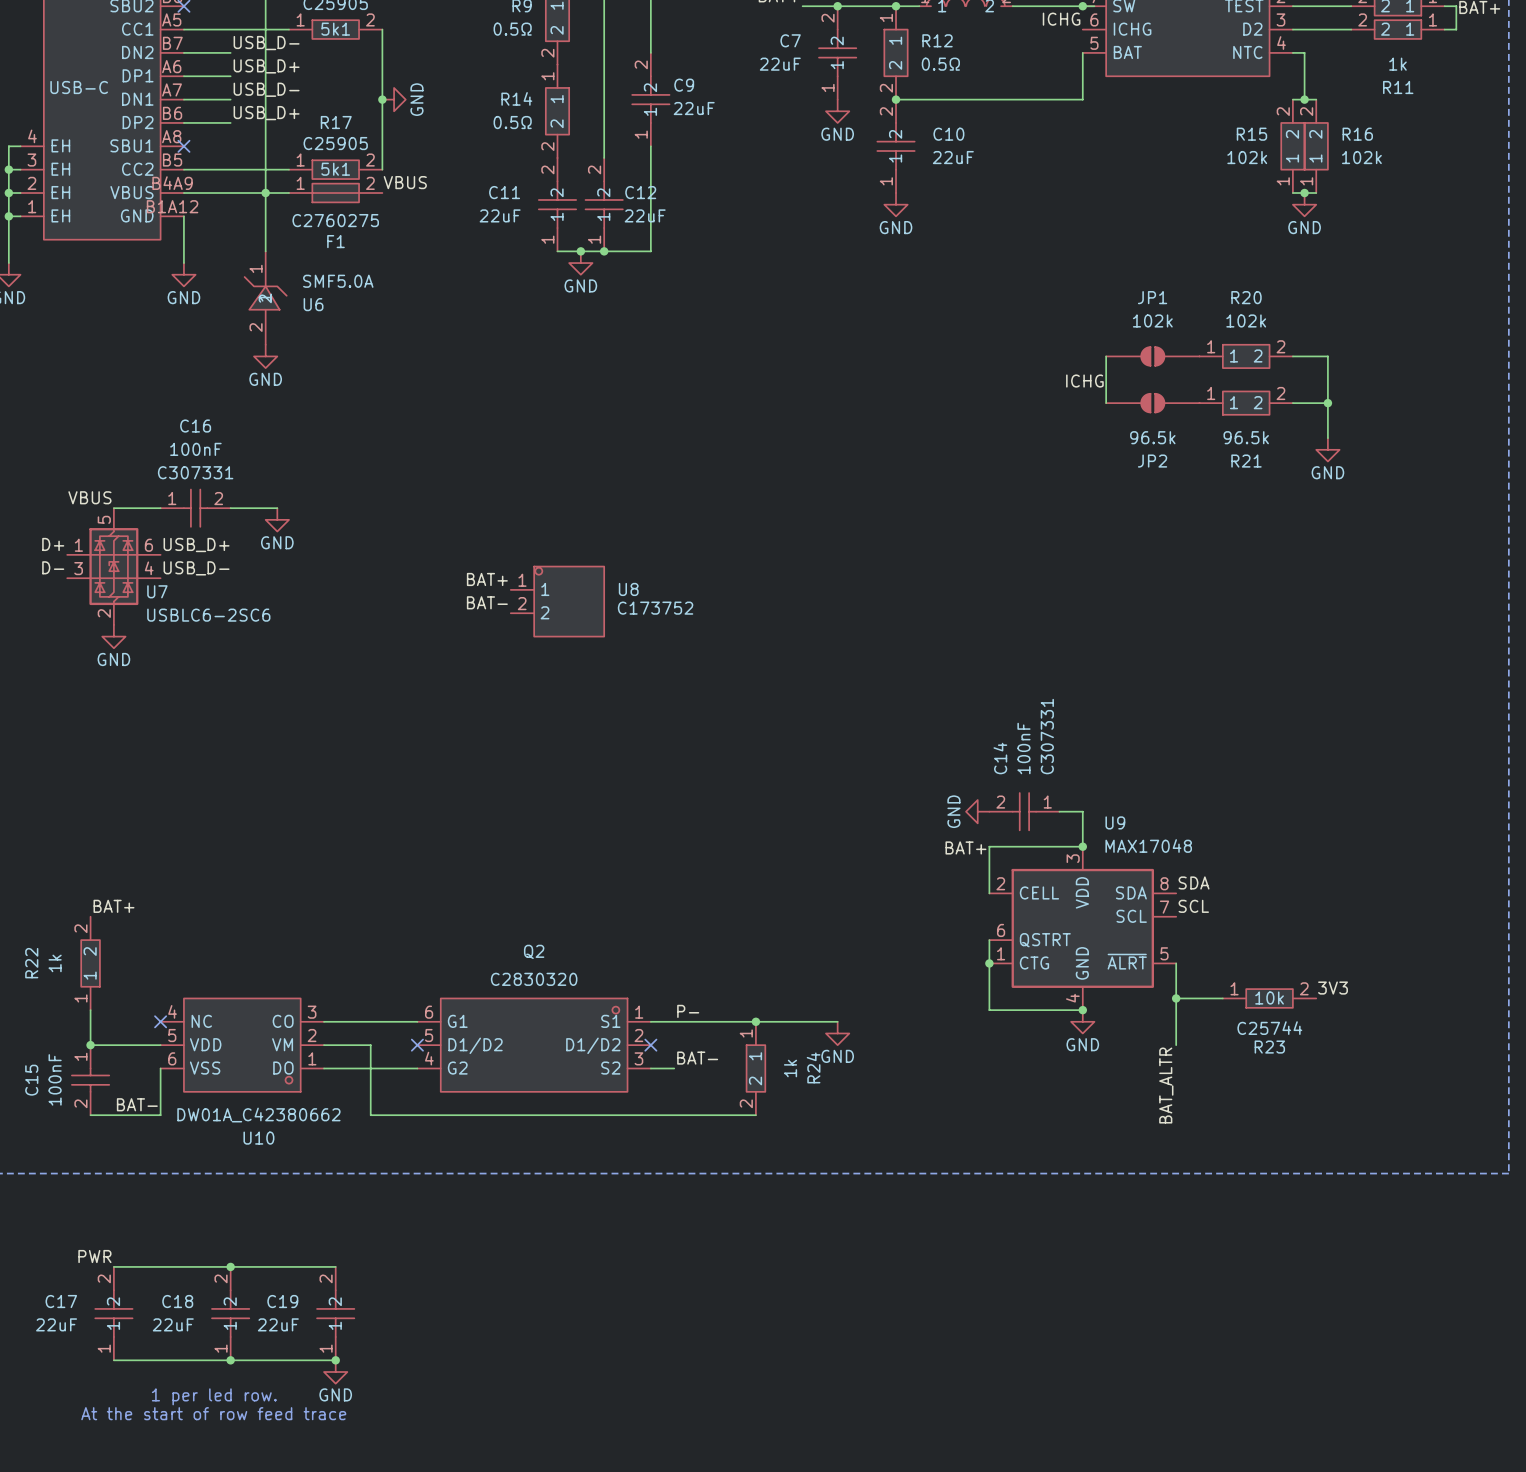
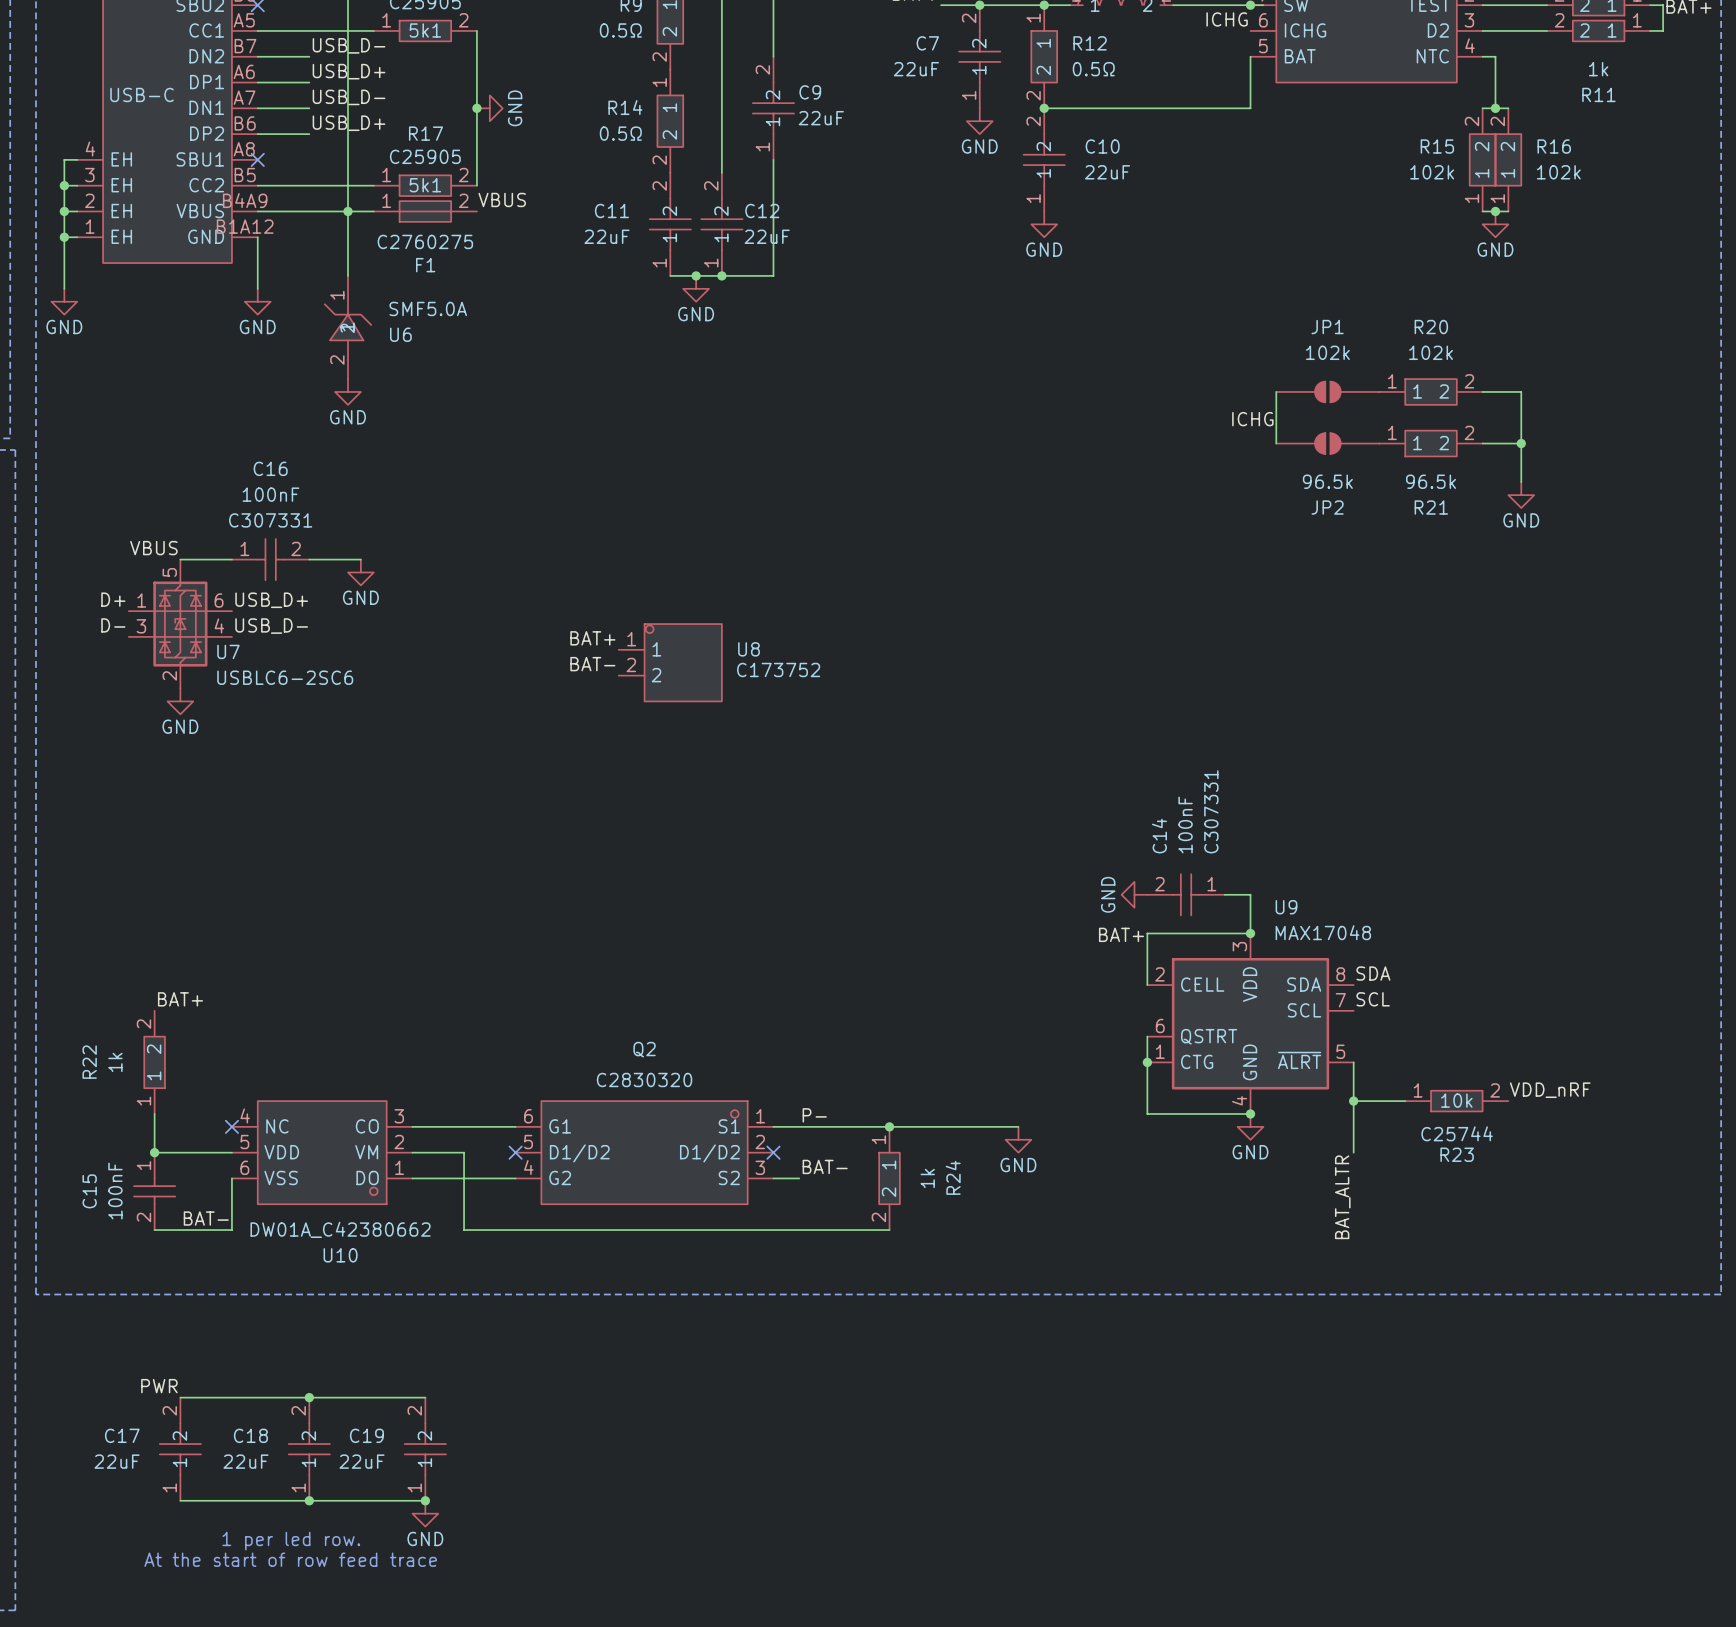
label: 3V3 (1333, 988) -> VDD_nRF (1550, 1090)
wire: none -> (979, 1126) (1018, 1126)
power symbol position: GND (837, 1033) -> GND (1018, 1139)

